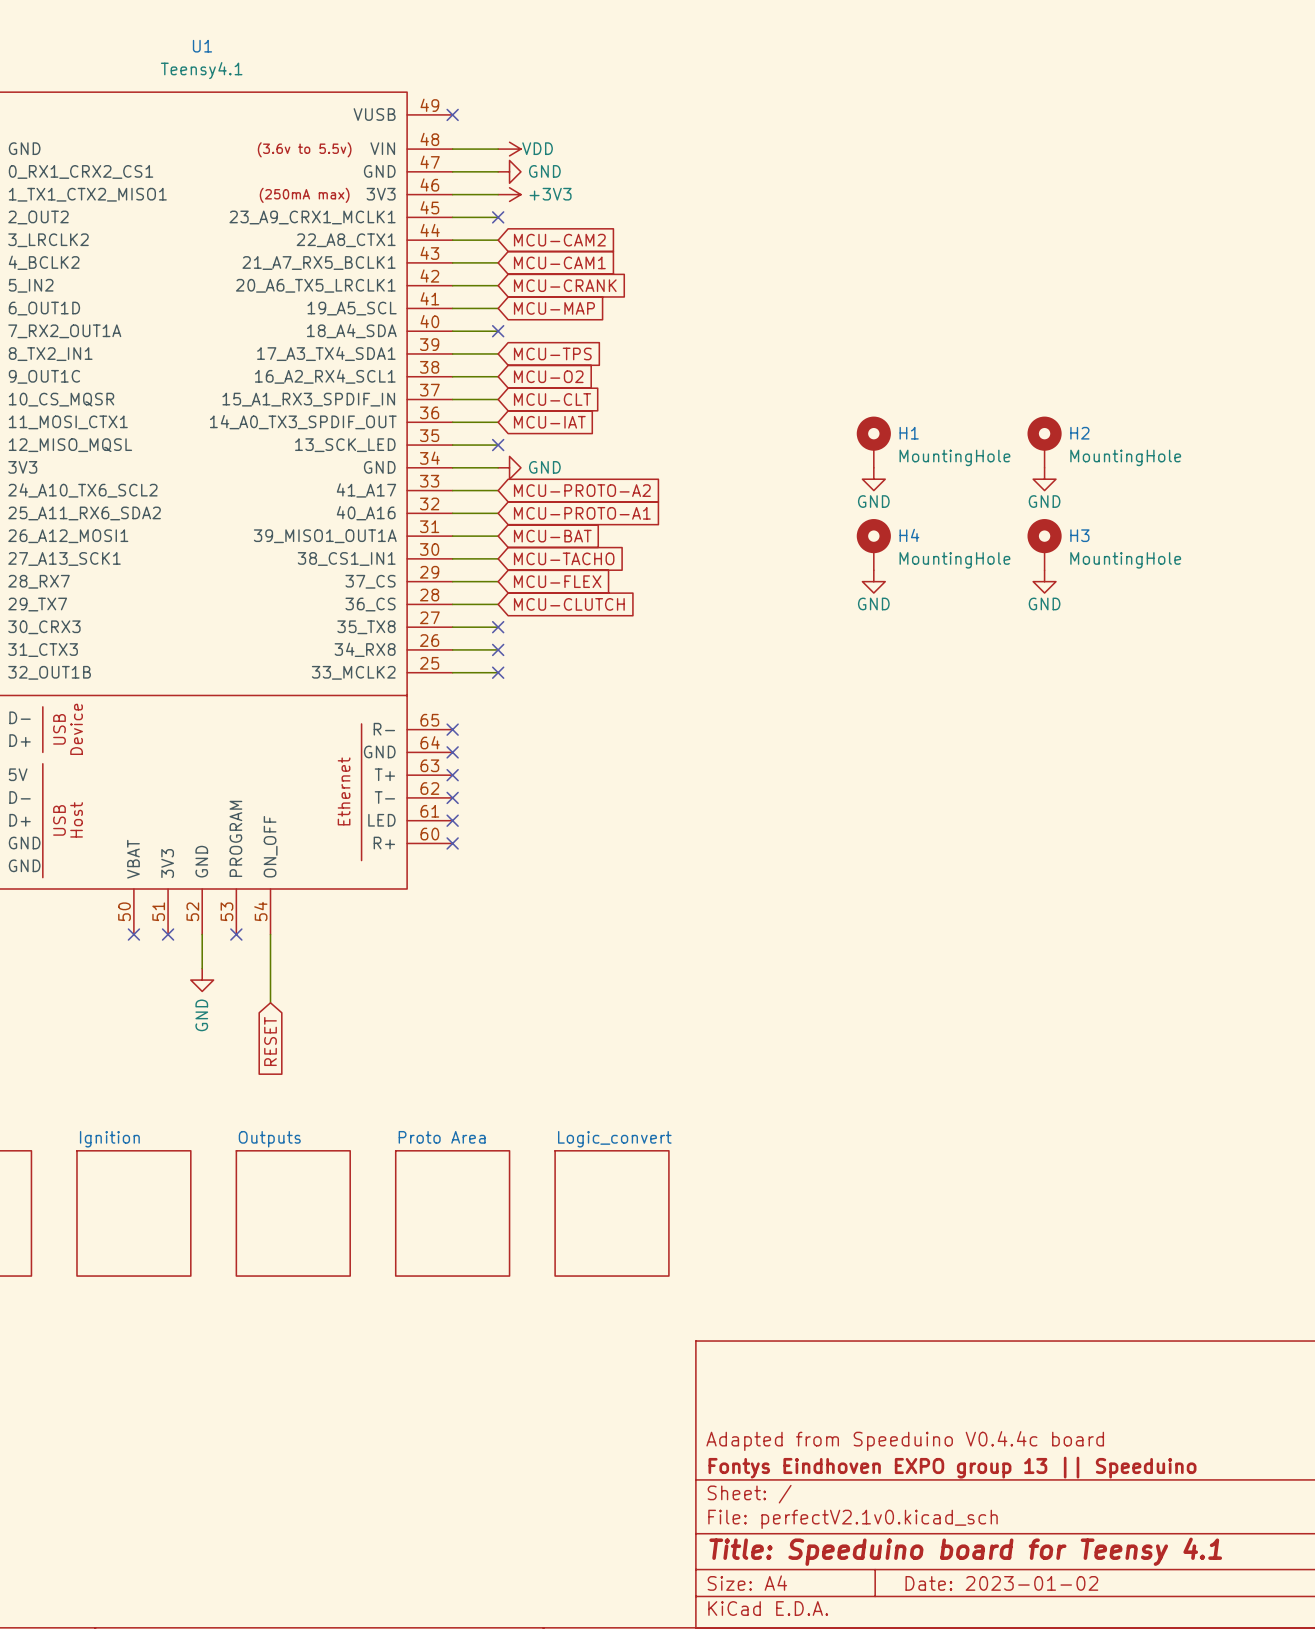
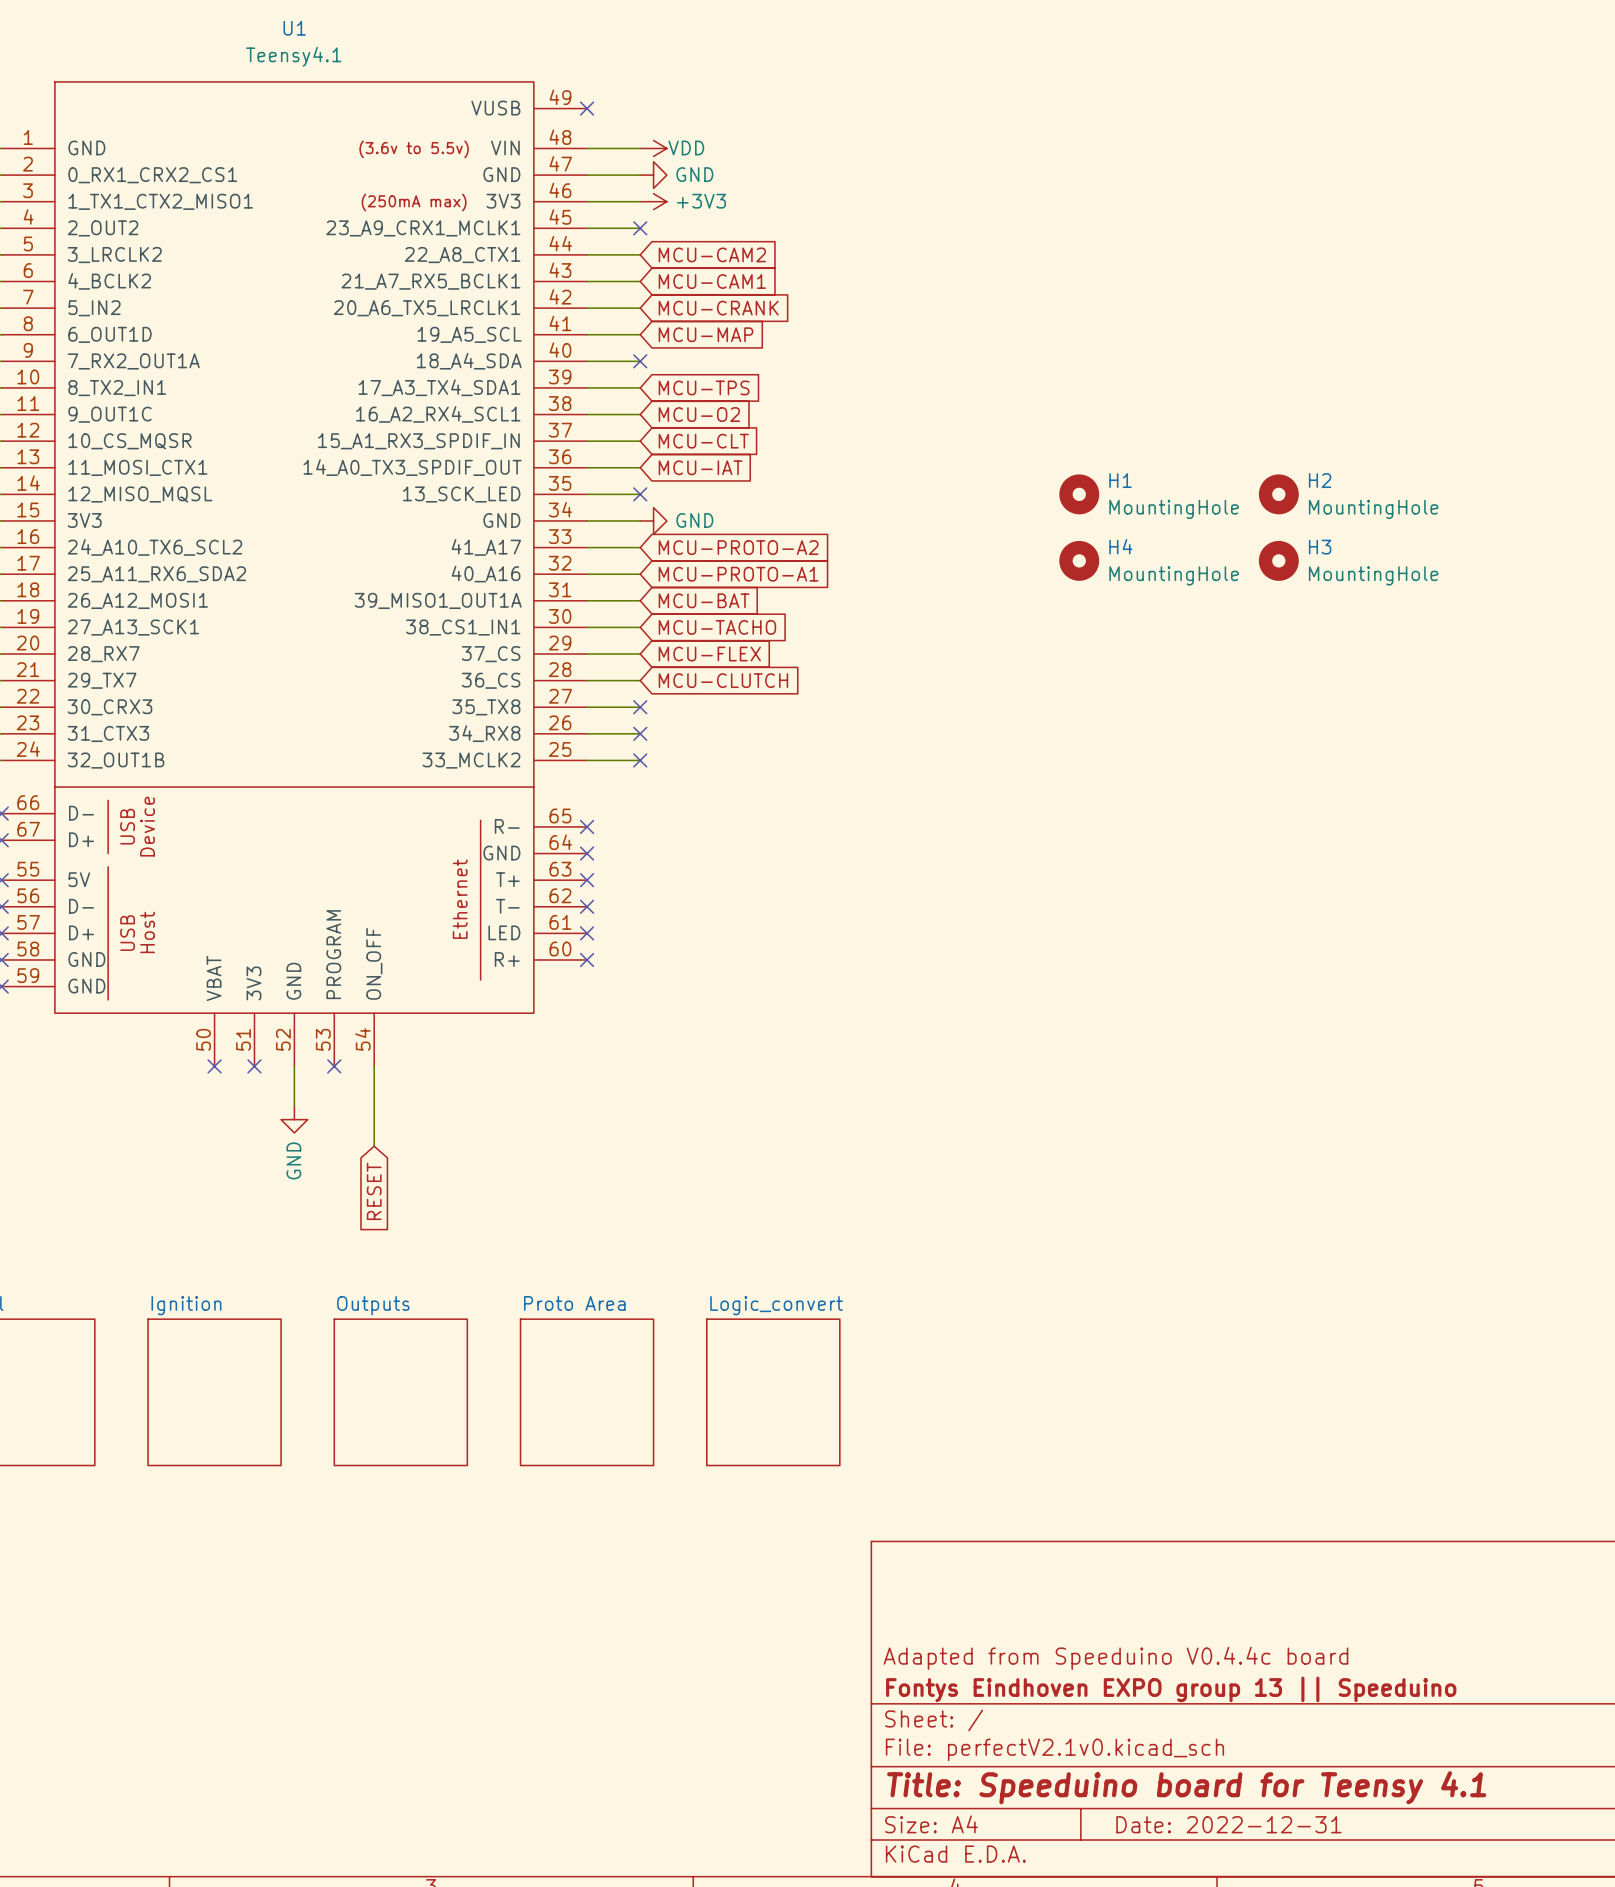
H1 symbol: [856, 416, 891, 468] -> [1059, 474, 1100, 515]
H2 symbol: [1027, 416, 1062, 468] -> [1258, 474, 1299, 515]
power symbol: GND (873, 479) -> none
power symbol: GND (1044, 479) -> none
H4 symbol: [856, 519, 891, 571] -> [1059, 540, 1100, 581]
H3 symbol: [1027, 519, 1062, 571] -> [1258, 540, 1299, 581]
power symbol: GND (873, 581) -> none
power symbol: GND (1044, 581) -> none
title block: Date: 2023-01-02 (1001, 1583) -> Date: 2022-12-31 (1228, 1824)

